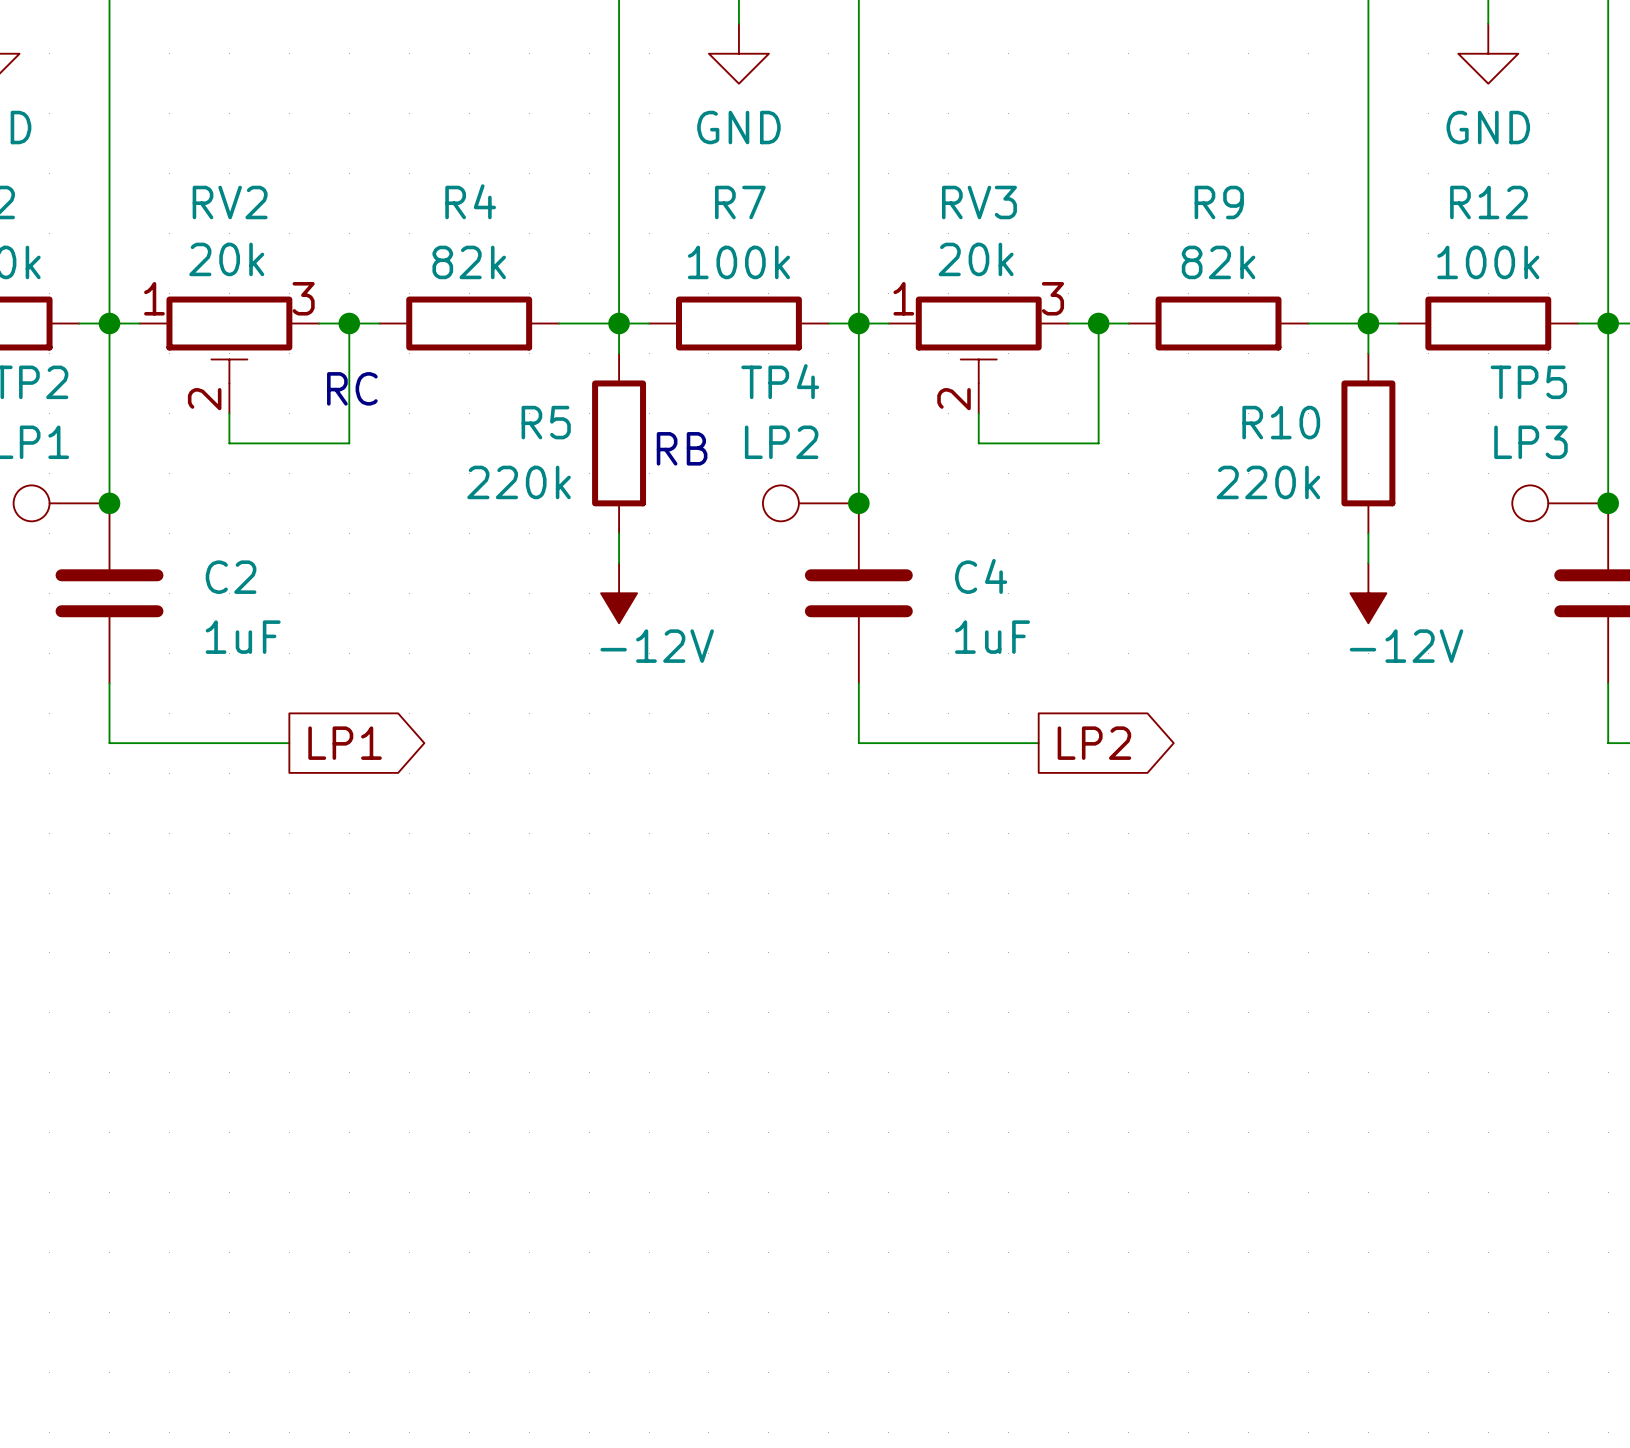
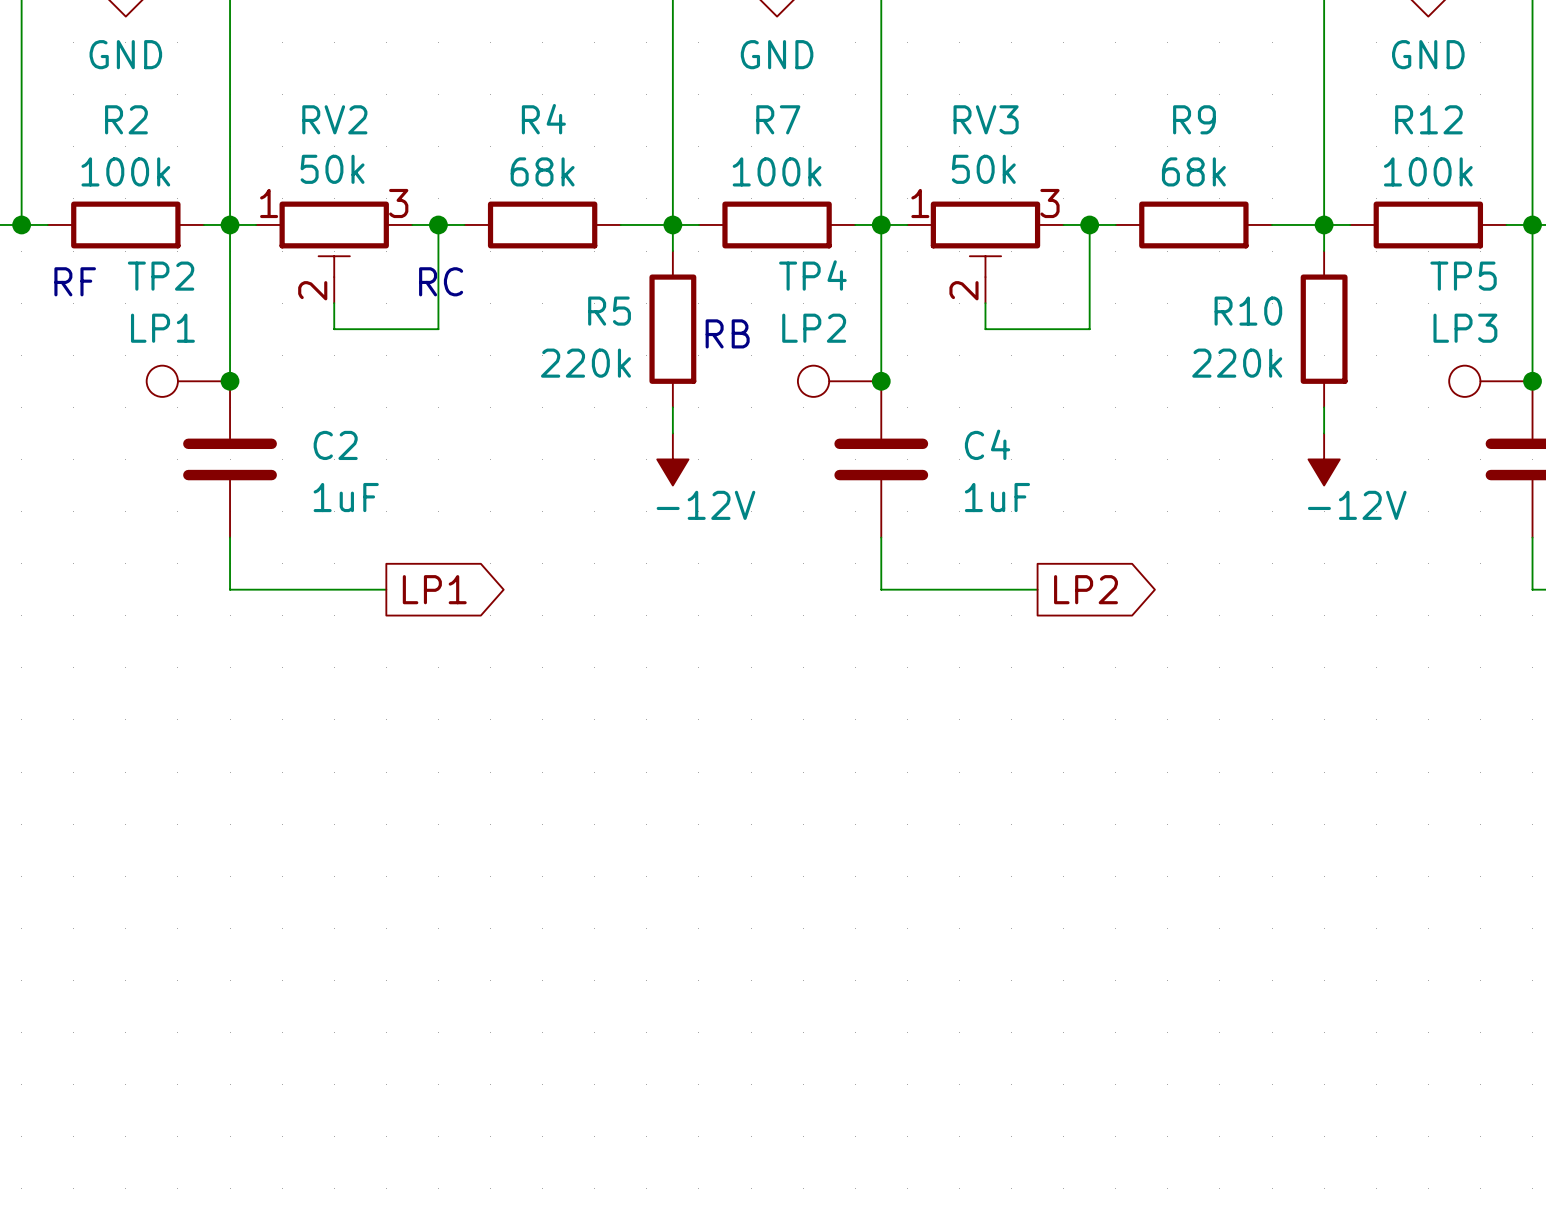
RV2 value: 20k (226, 259) -> 50k (332, 169)
RV3 value: 20k (976, 259) -> 50k (983, 169)
R4 value: 82k (469, 262) -> 68k (542, 171)
R9 value: 82k (1218, 262) -> 68k (1193, 171)

